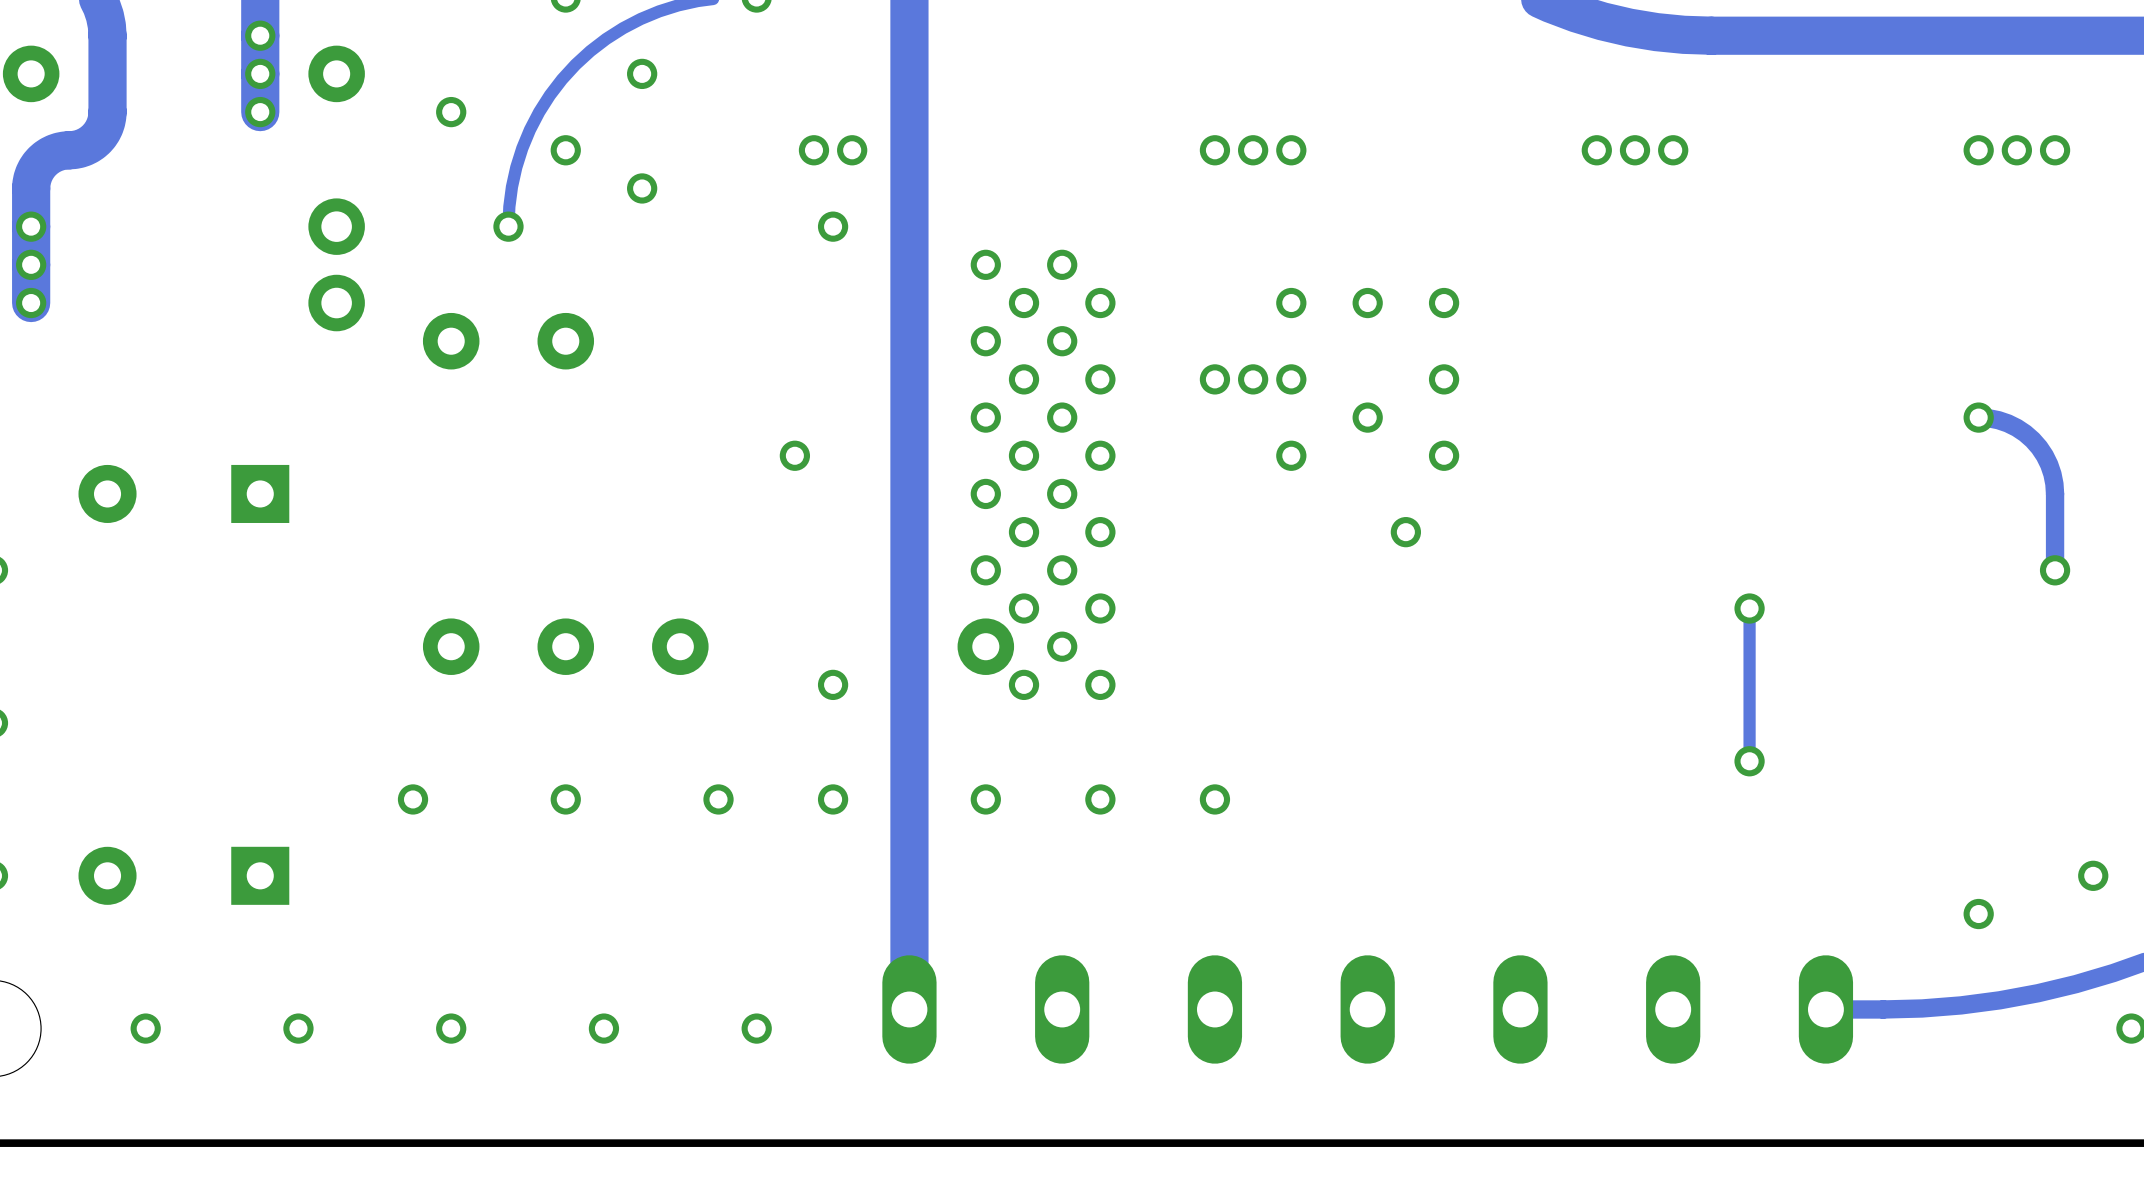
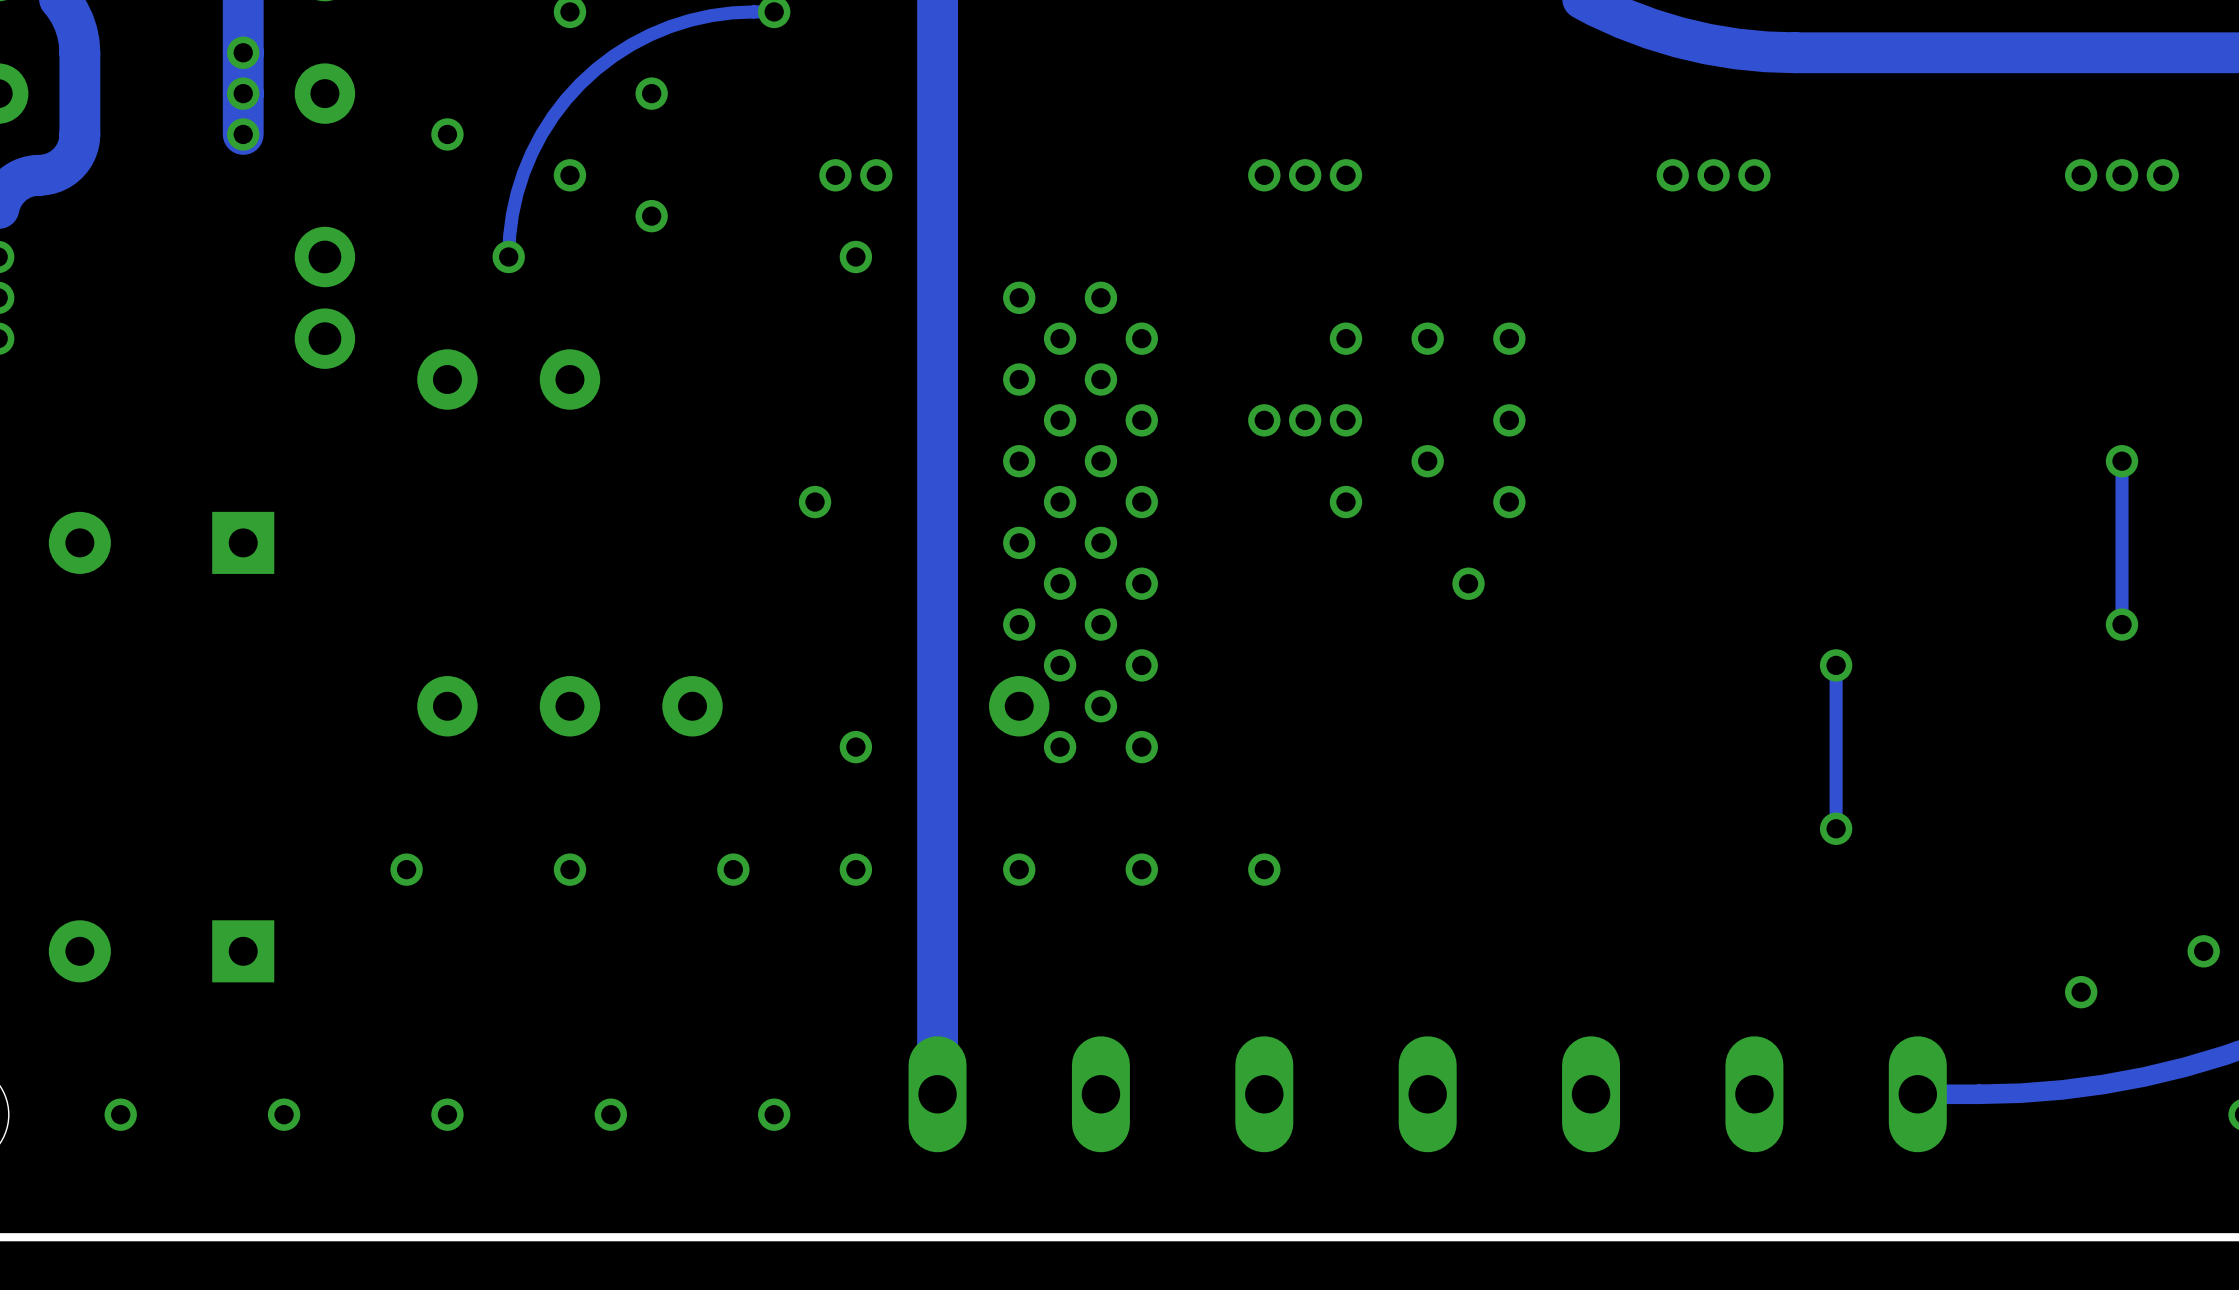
track: (1978, 417) (1998, 420) (2016, 427) (2032, 439) (2044, 455) (2054, 483) (2055, 570) -> none
via position: (1978, 417) -> (2122, 461)
track: none -> (2122, 461) (2122, 624)
via position: (2055, 570) -> (2122, 624)

